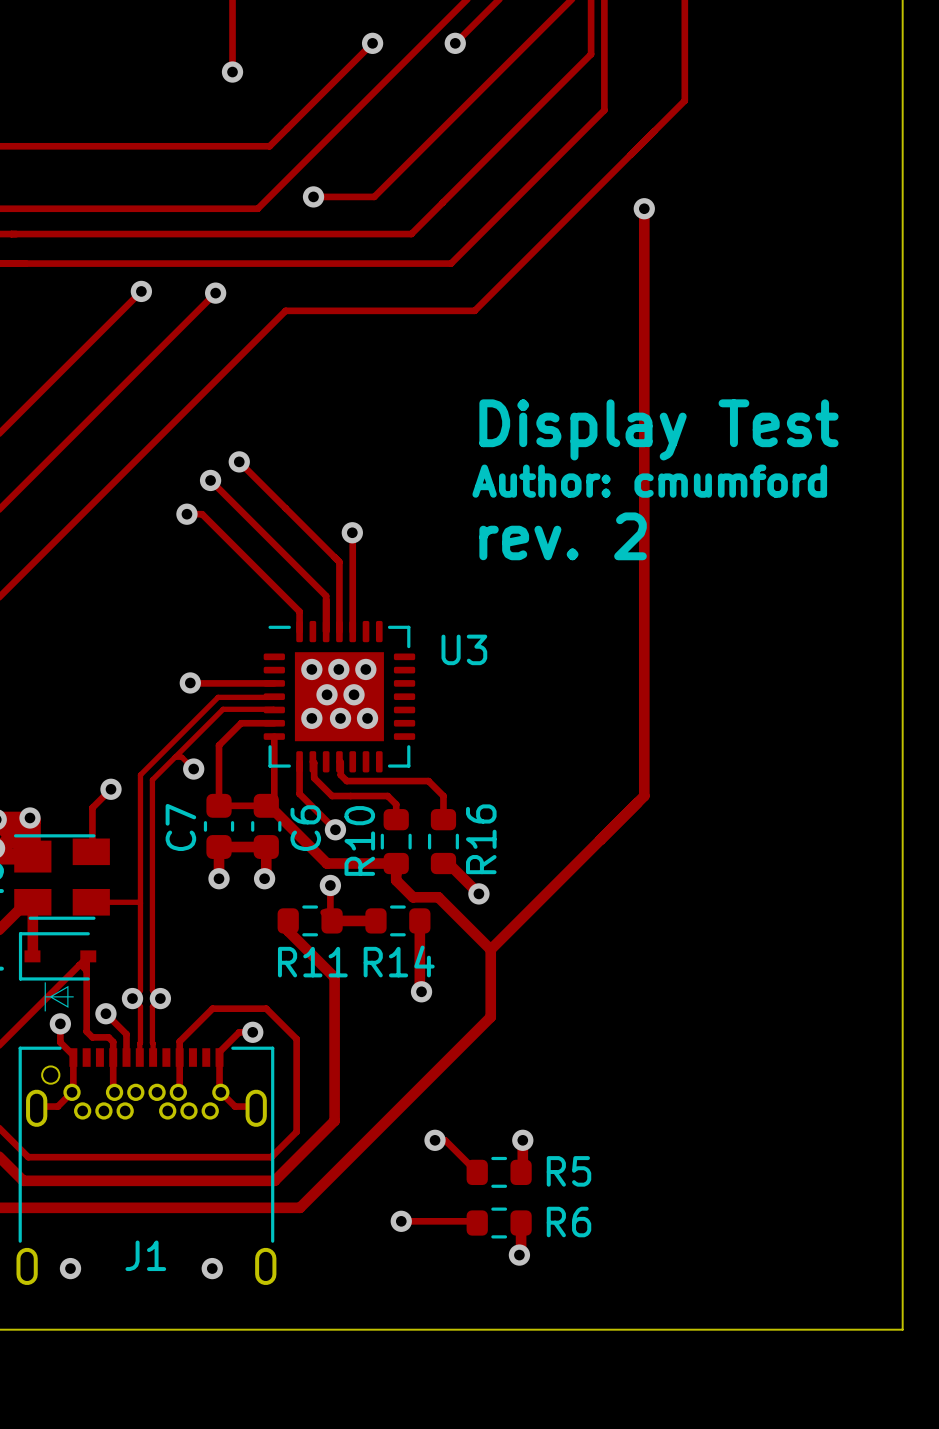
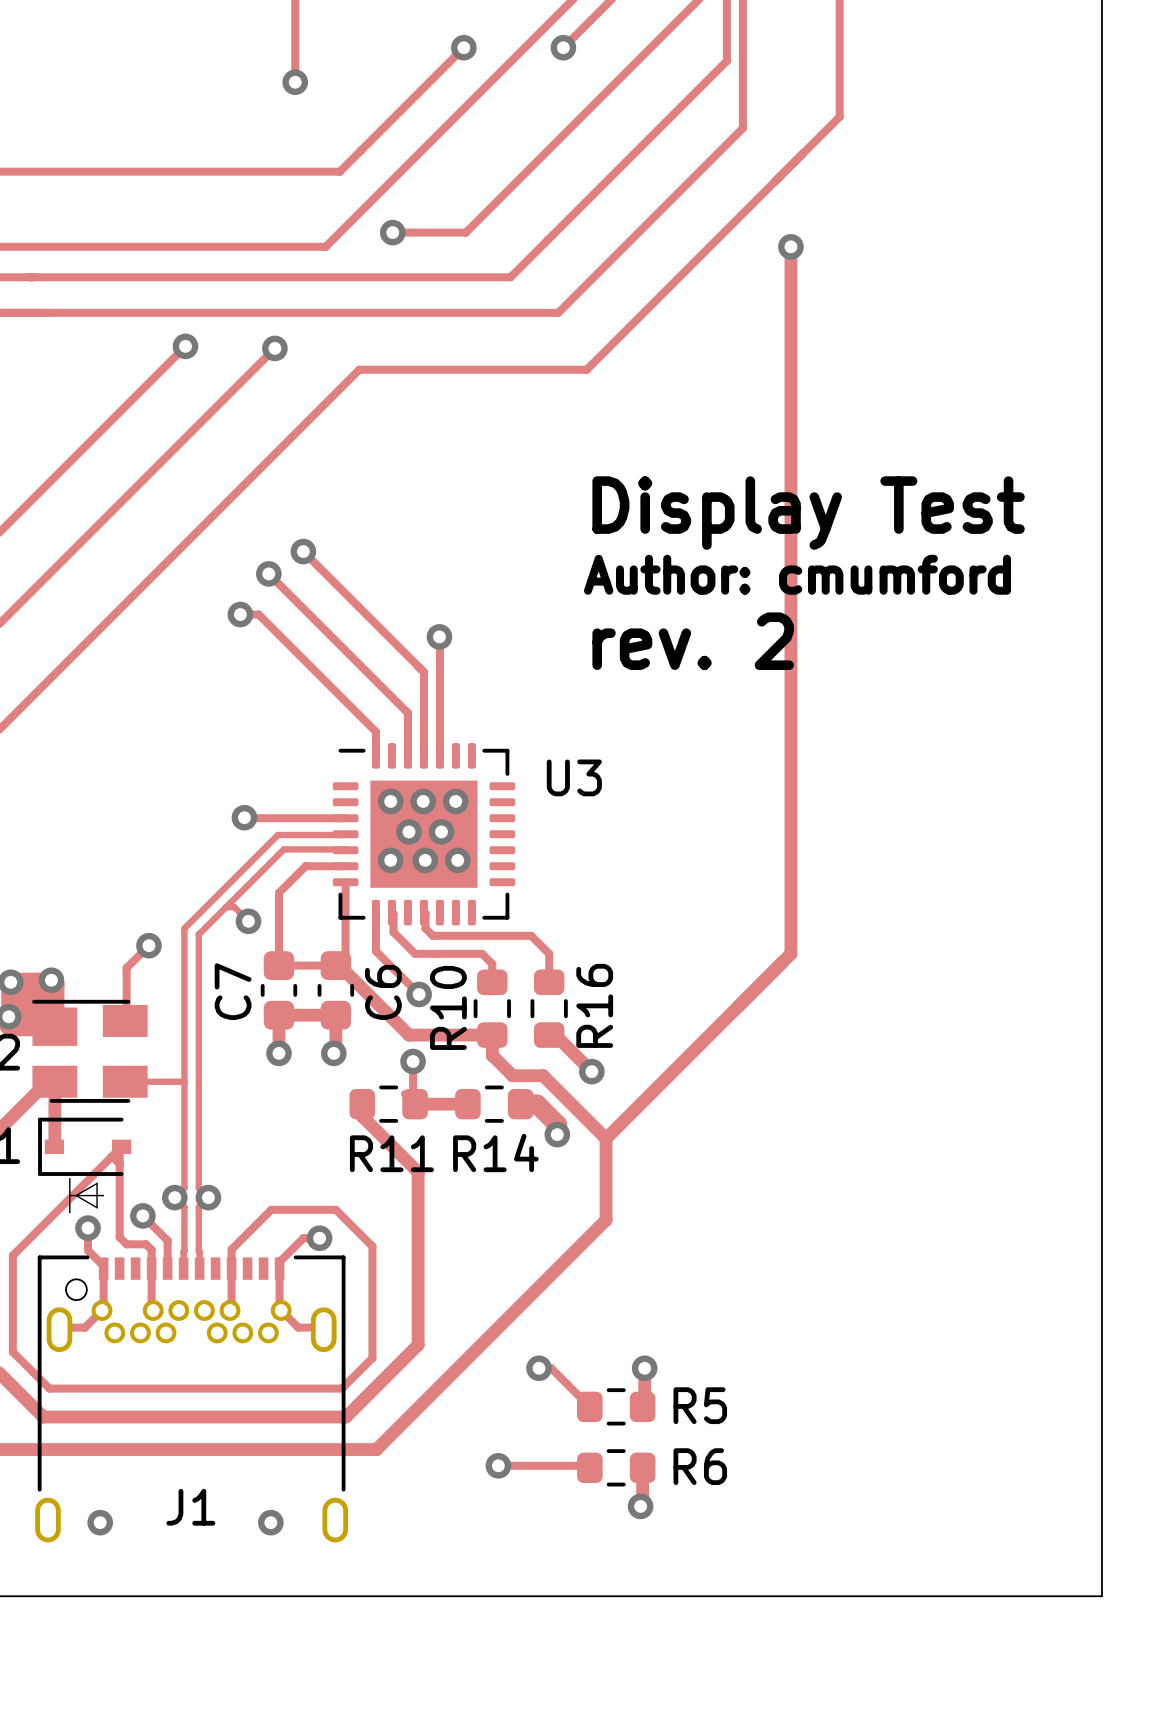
track: (419, 920) (419, 990) (421, 991) -> (520, 1104) (536, 1104) (557, 1124) (557, 1134)
via position: (421, 991) -> (557, 1134)

